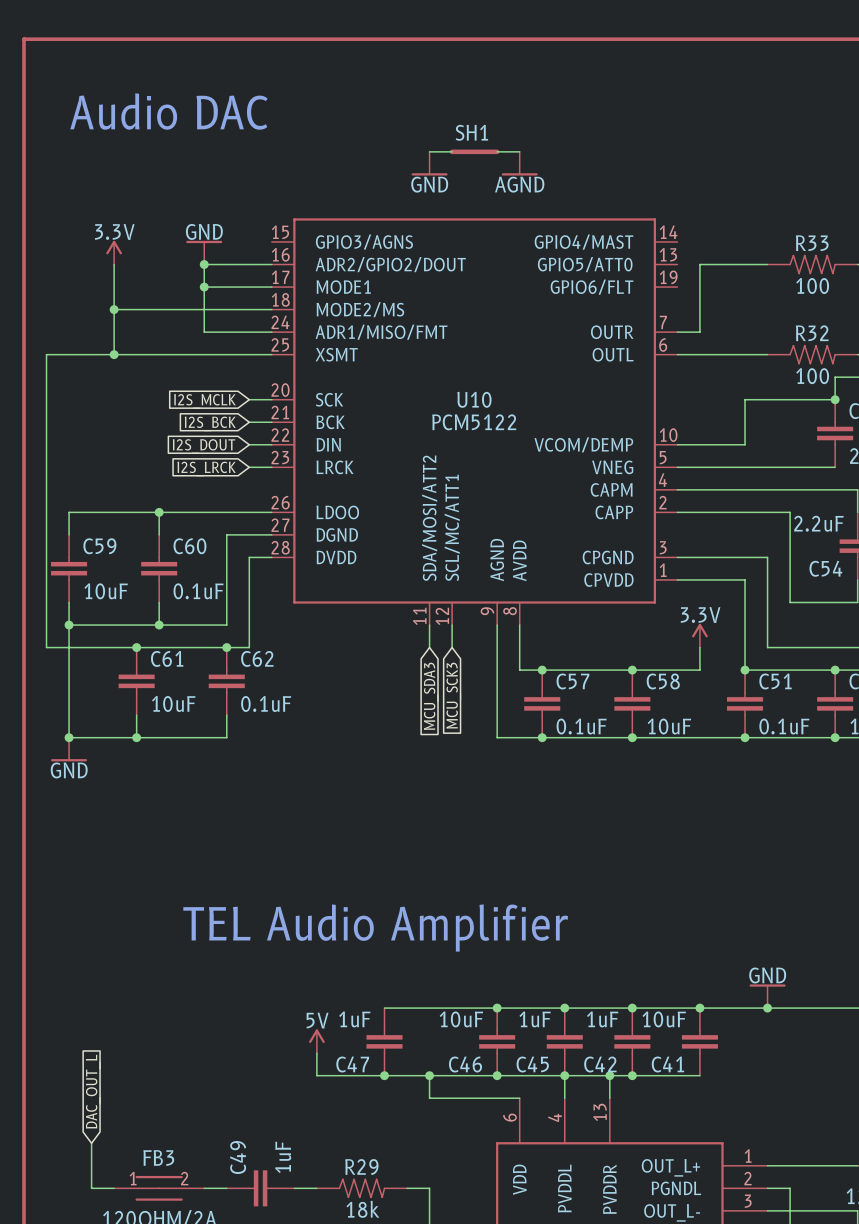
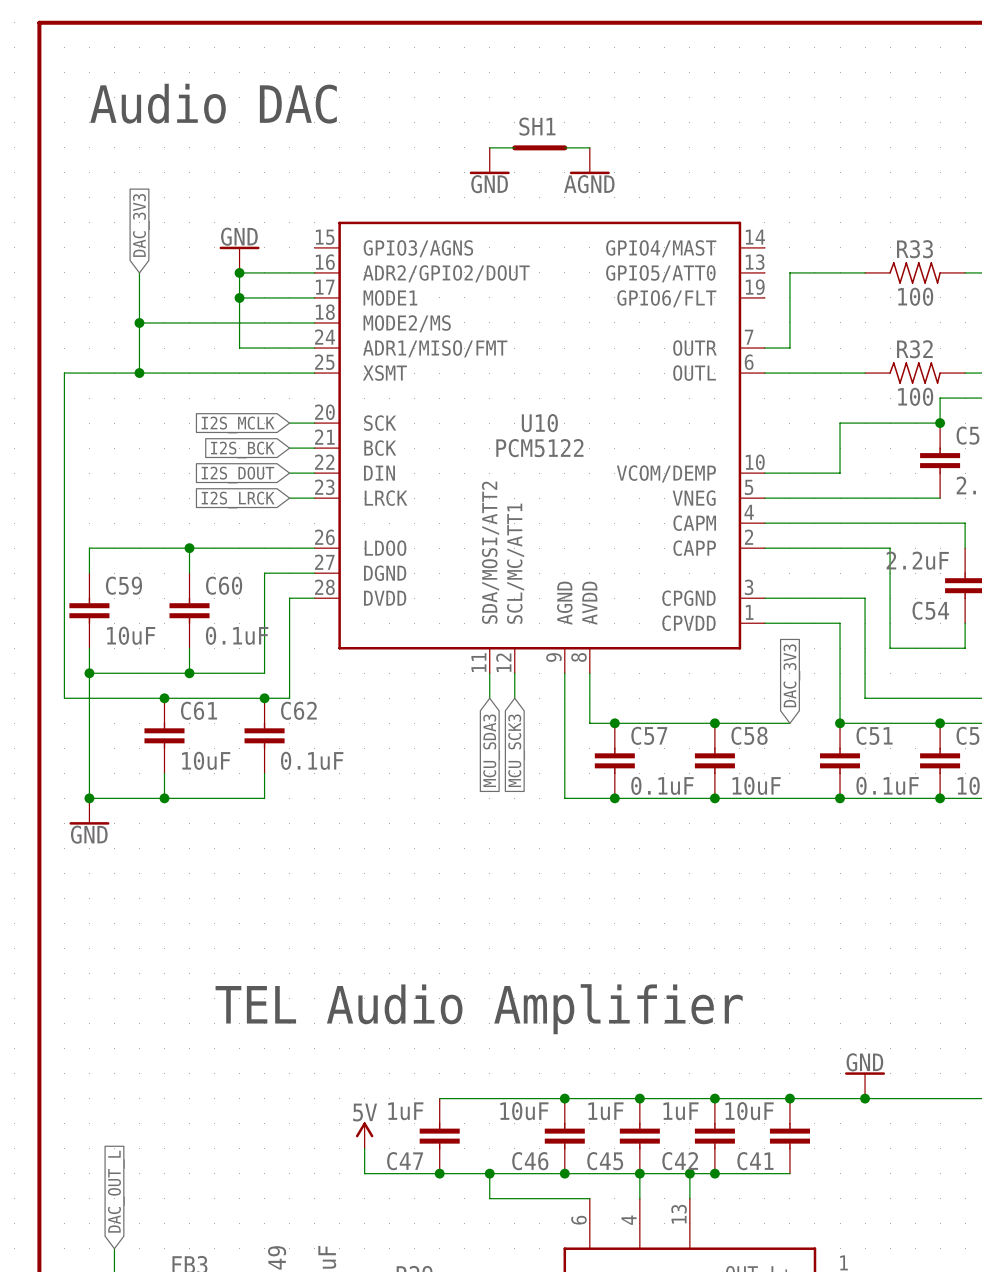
global label: none -> DAC_3V3 (141, 225)
power symbol: 3.3V (114, 252) -> none
global label: none -> DAC_3V3 (791, 675)
power symbol: 3.3V (699, 635) -> none
wire: (699, 647) (699, 670) -> none

